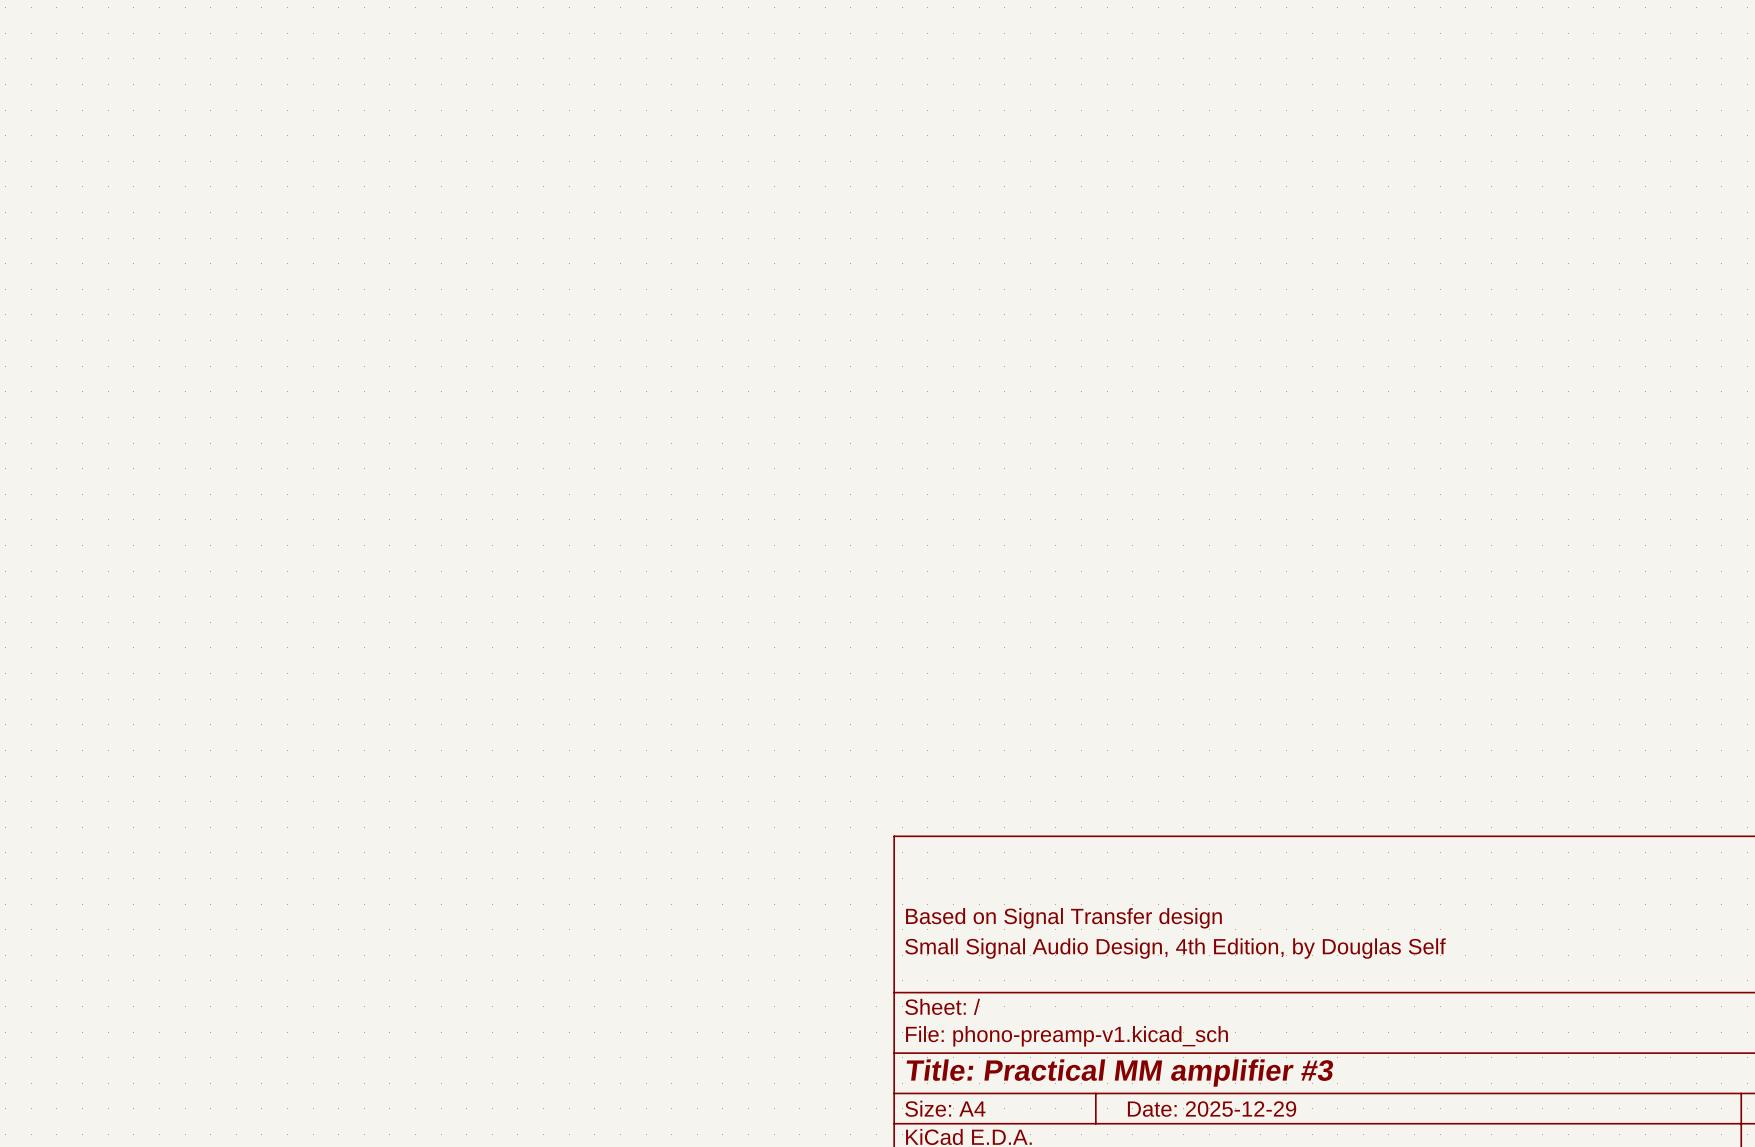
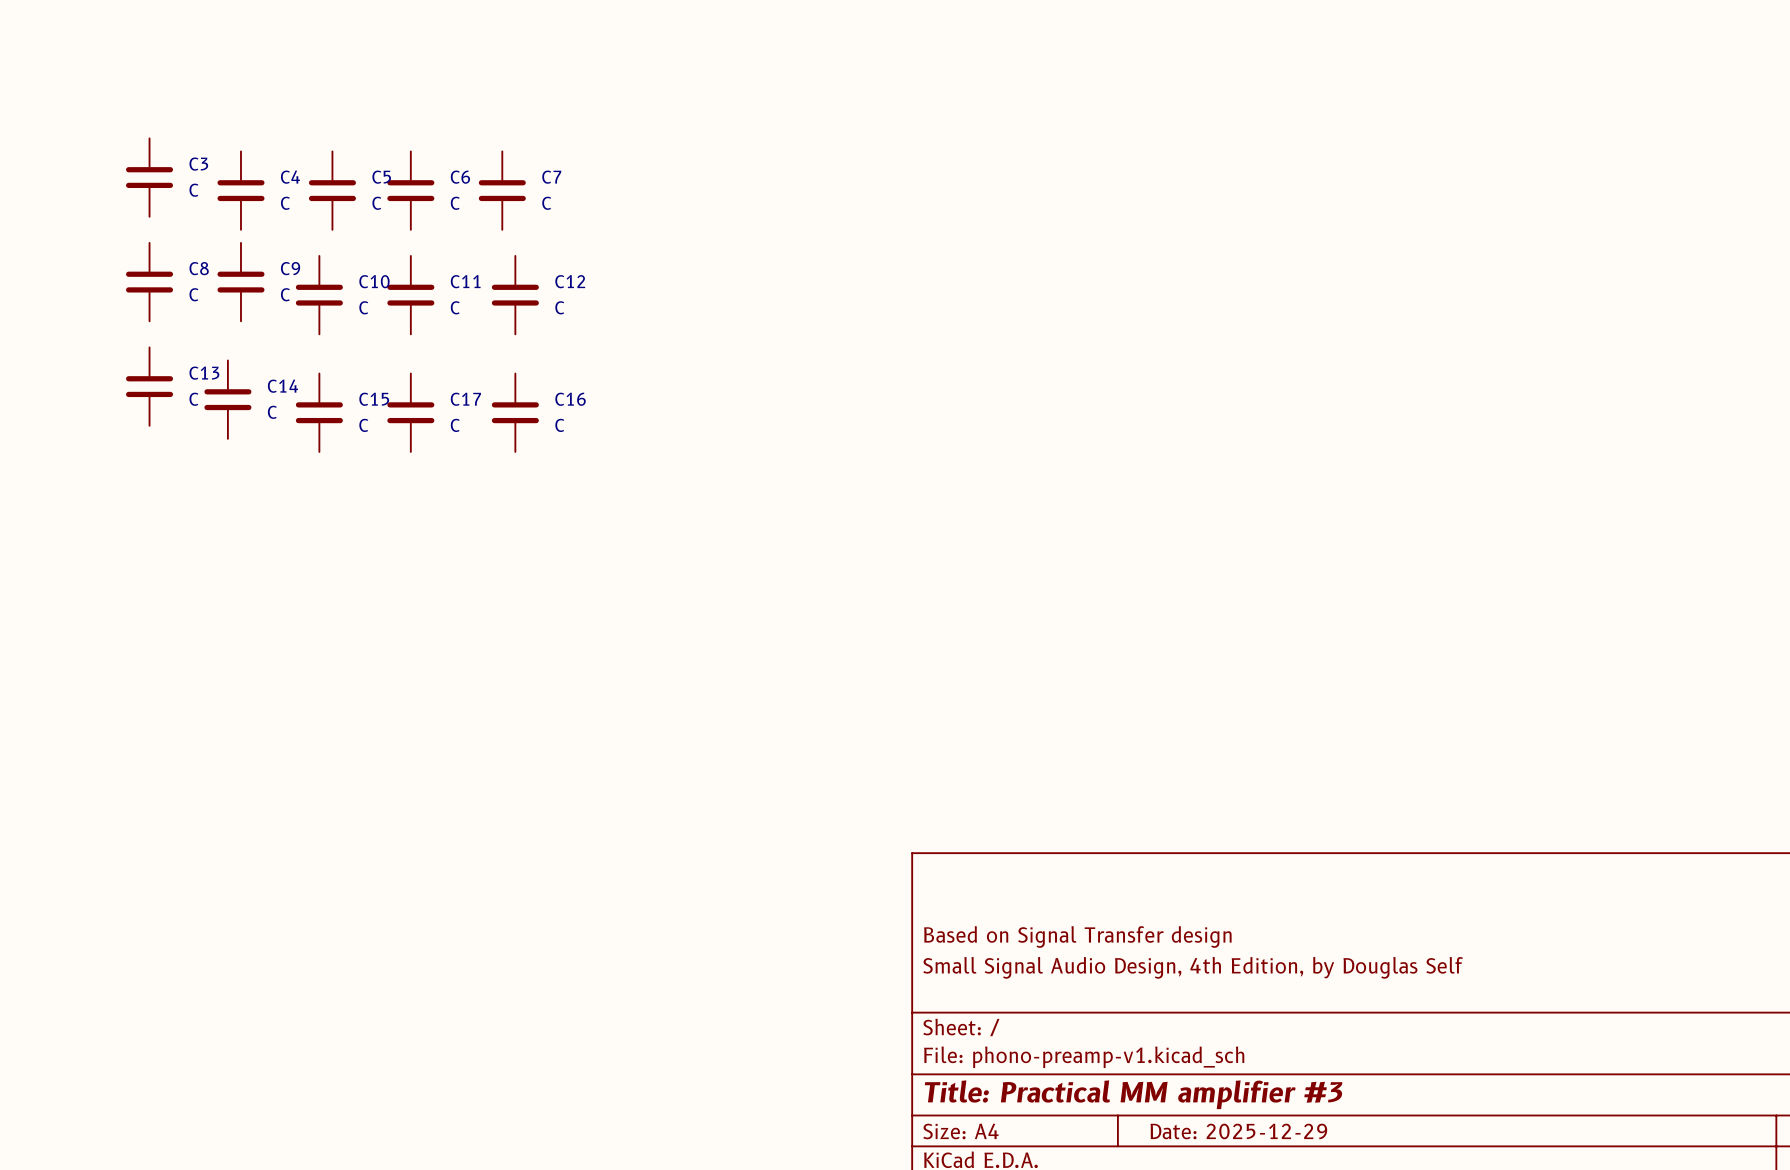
C3: none -> C (149, 177)
C4: none -> C (240, 190)
C5: none -> C (332, 190)
C6: none -> C (410, 190)
C7: none -> C (502, 190)
C8: none -> C (149, 282)
C9: none -> C (240, 282)
C10: none -> C (319, 295)
C11: none -> C (410, 295)
C12: none -> C (515, 295)
C13: none -> C (149, 386)
C14: none -> C (227, 399)
C15: none -> C (319, 412)
C17: none -> C (410, 412)
C16: none -> C (515, 412)

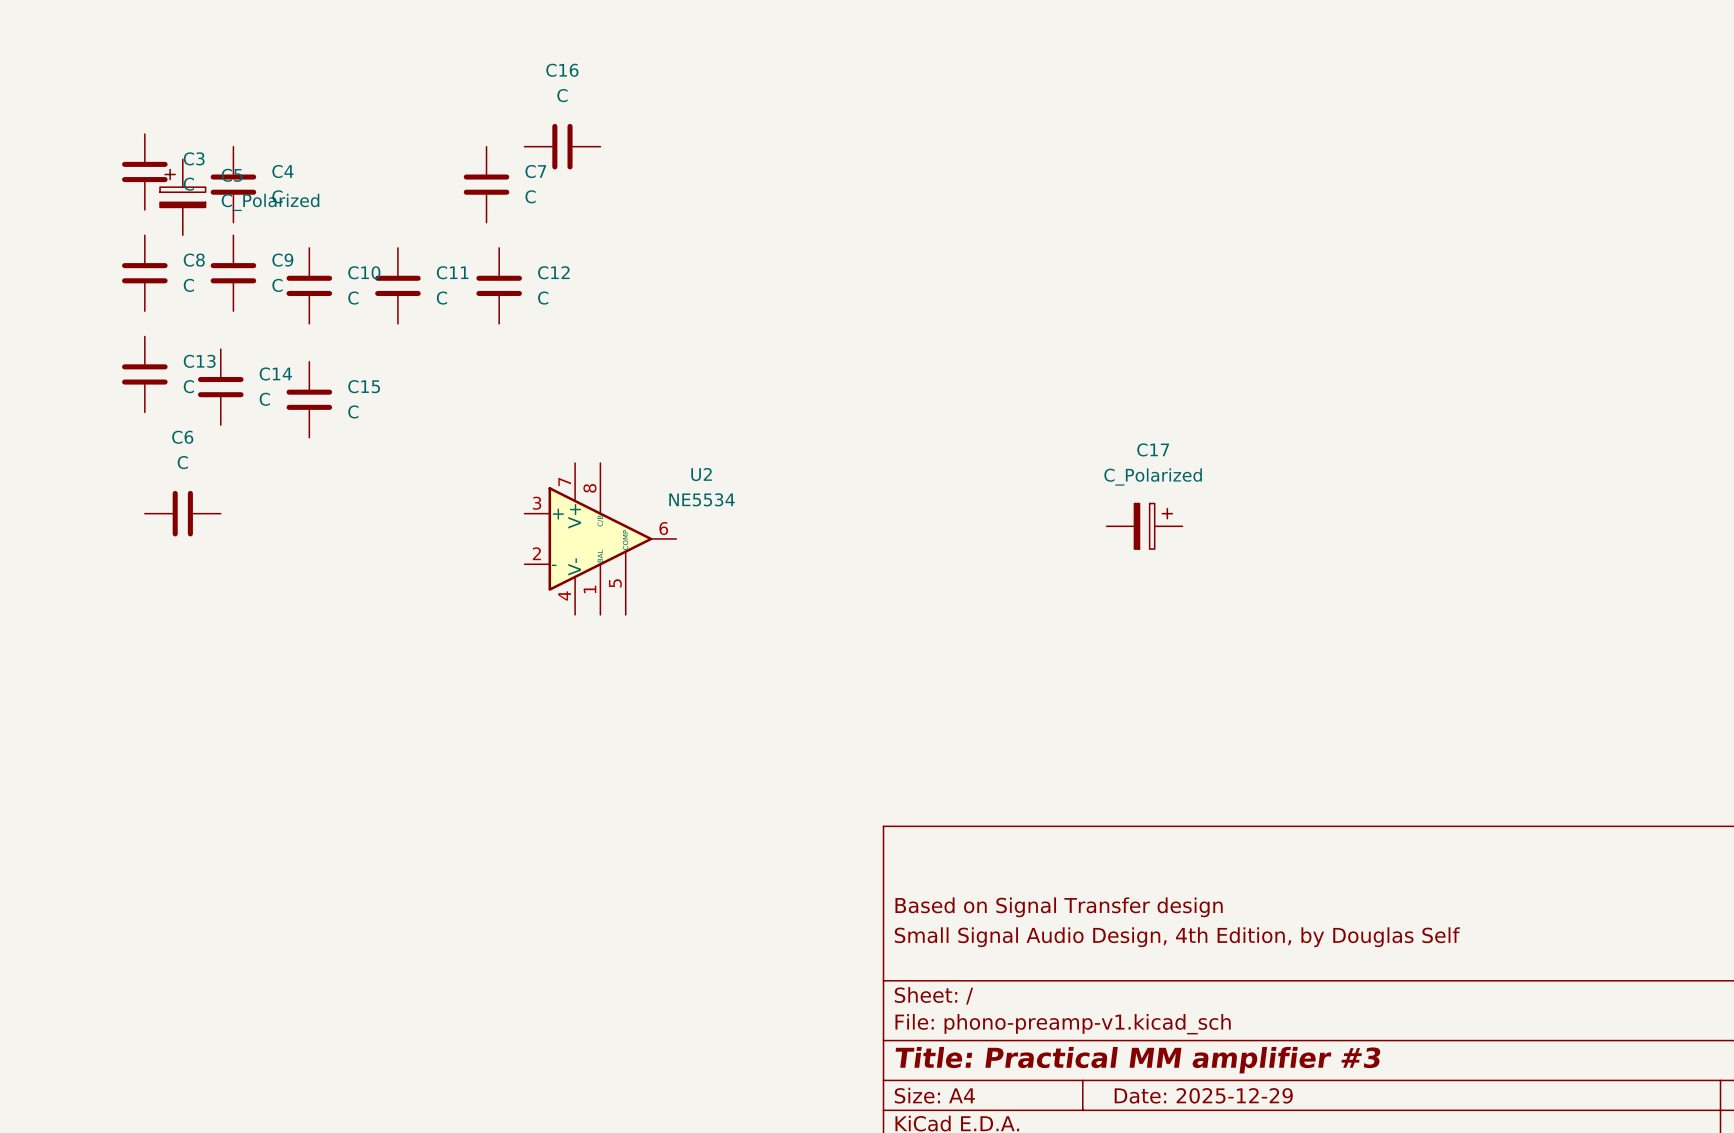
C5 symbol: [308, 151, 356, 230] -> [160, 159, 206, 236]
C6 name position: C6 (460, 177) -> C6 (182, 437)
C6 rotation: 0° (410, 190) -> 90° clockwise (182, 513)
C6 position: (410, 190) -> (182, 513)
C5 value: C (376, 203) -> C_Polarized (270, 202)
C6 value position: C (455, 203) -> C (182, 462)
C17 symbol: [387, 373, 435, 452] -> [1106, 503, 1183, 550]
C17 name position: C17 (465, 399) -> C17 (1153, 449)
C16 name position: C16 (570, 399) -> C16 (562, 70)
C16 rotation: 0° (515, 412) -> 90° clockwise (562, 146)
C16 position: (515, 412) -> (562, 146)
C17 value: C (455, 425) -> C_Polarized (1153, 477)
C16 value position: C (559, 425) -> C (562, 95)
U2: none -> NE5534 (600, 538)

